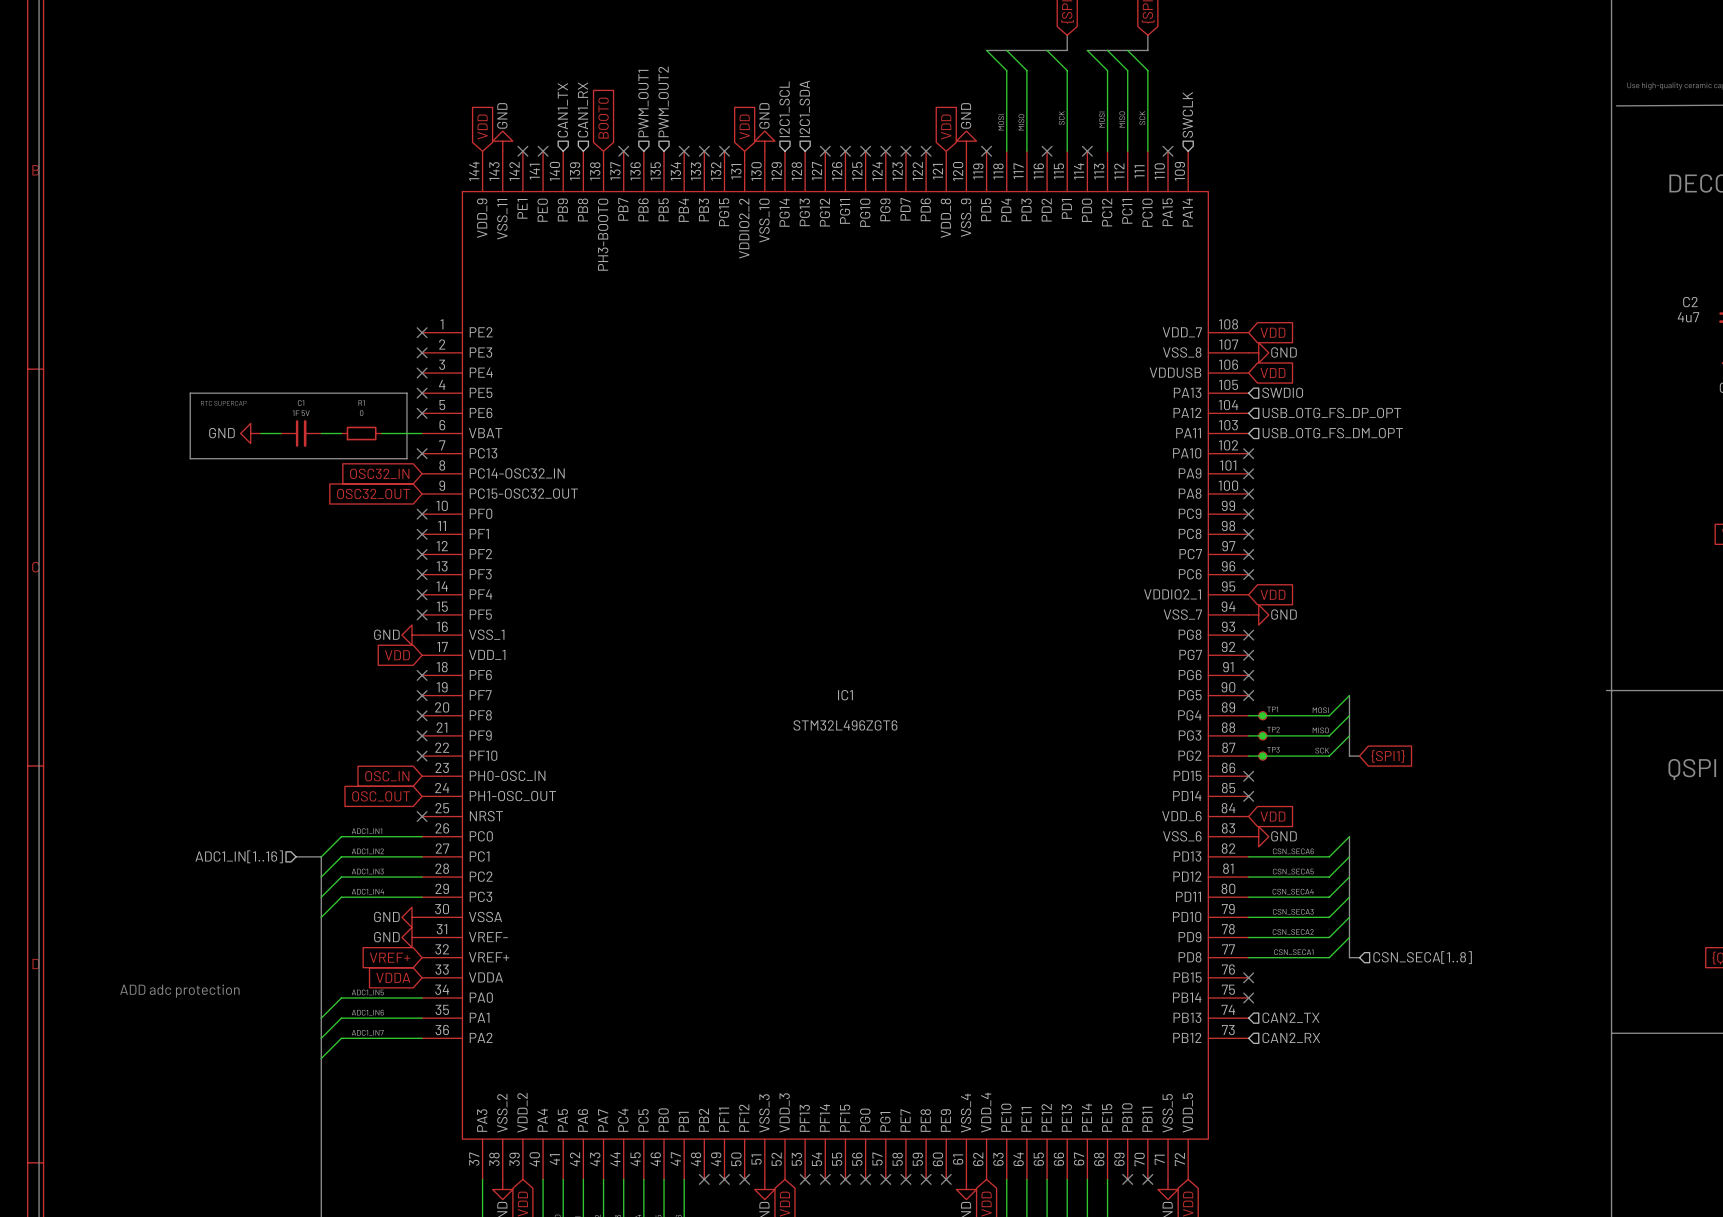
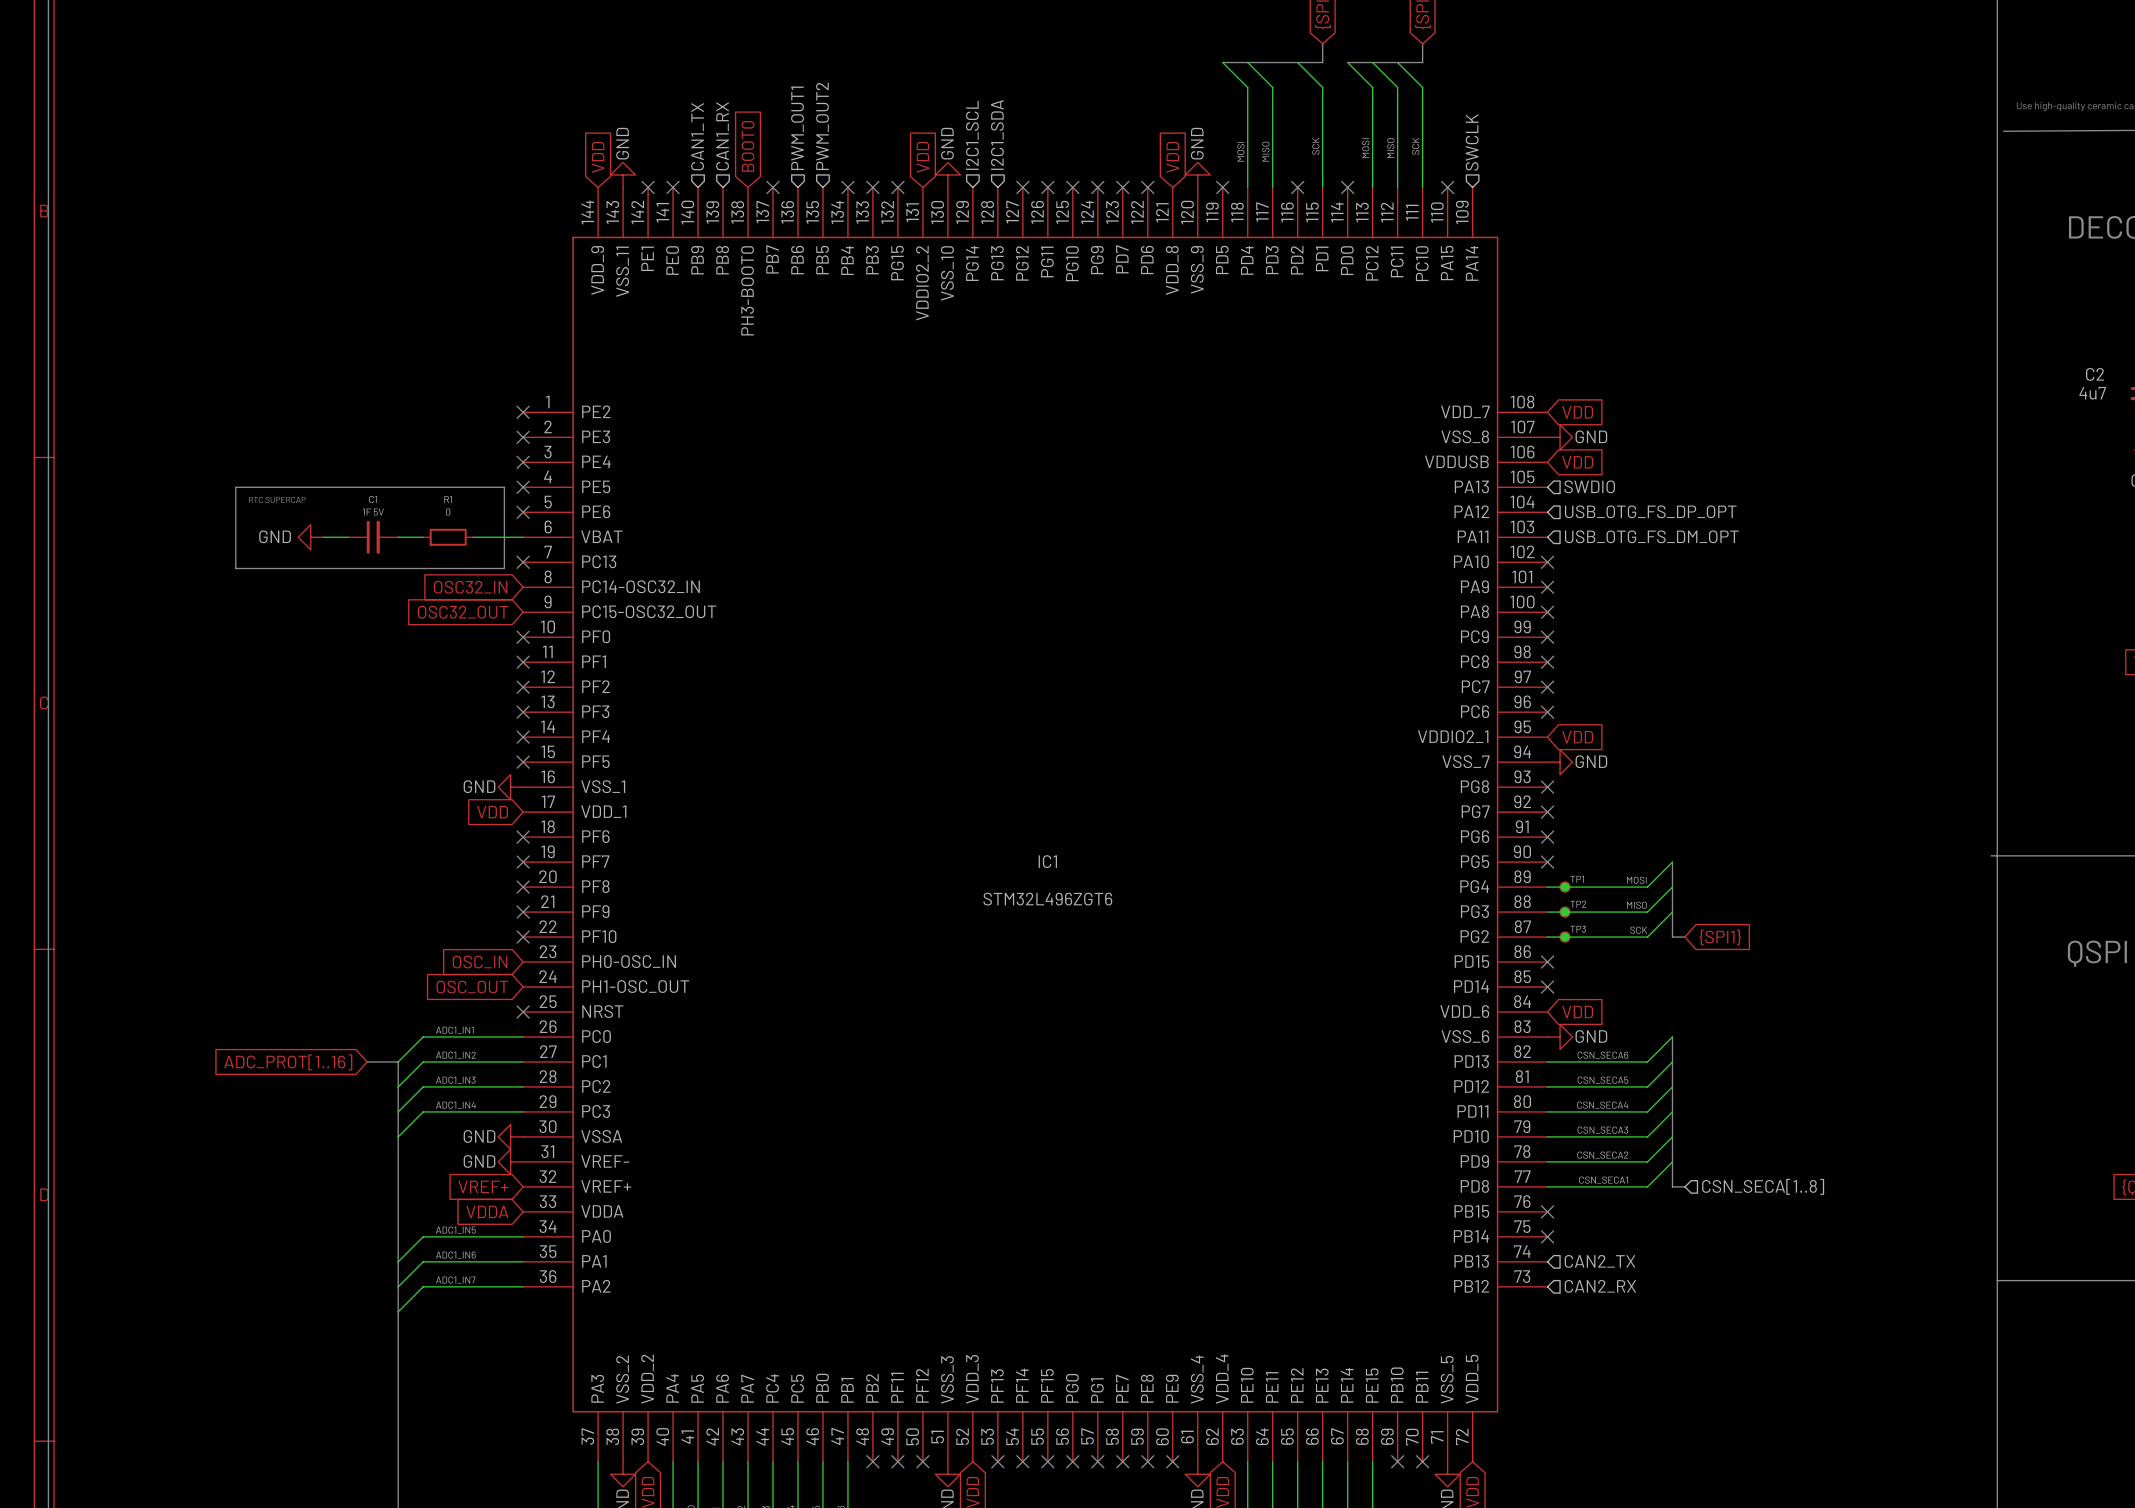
hierarchical label: ADC1_IN[1..16] (239, 856) -> none
global label: none -> ADC_PROT[1..16] (288, 1062)
text: ADD adc protection (179, 991) -> none

